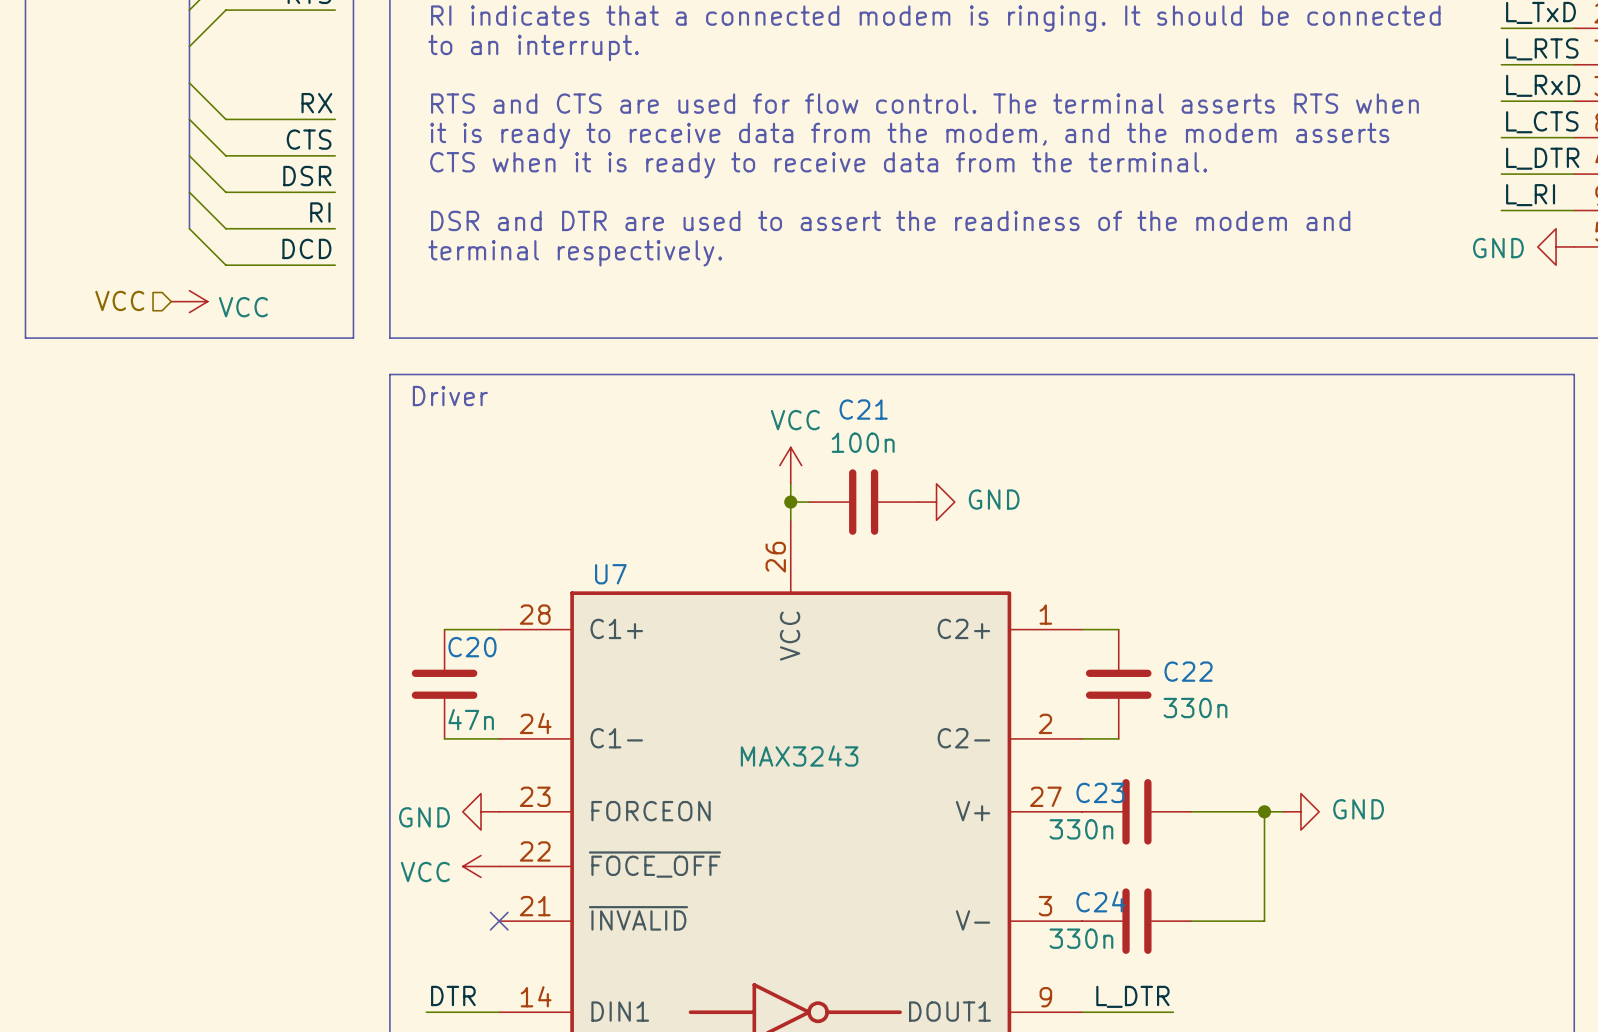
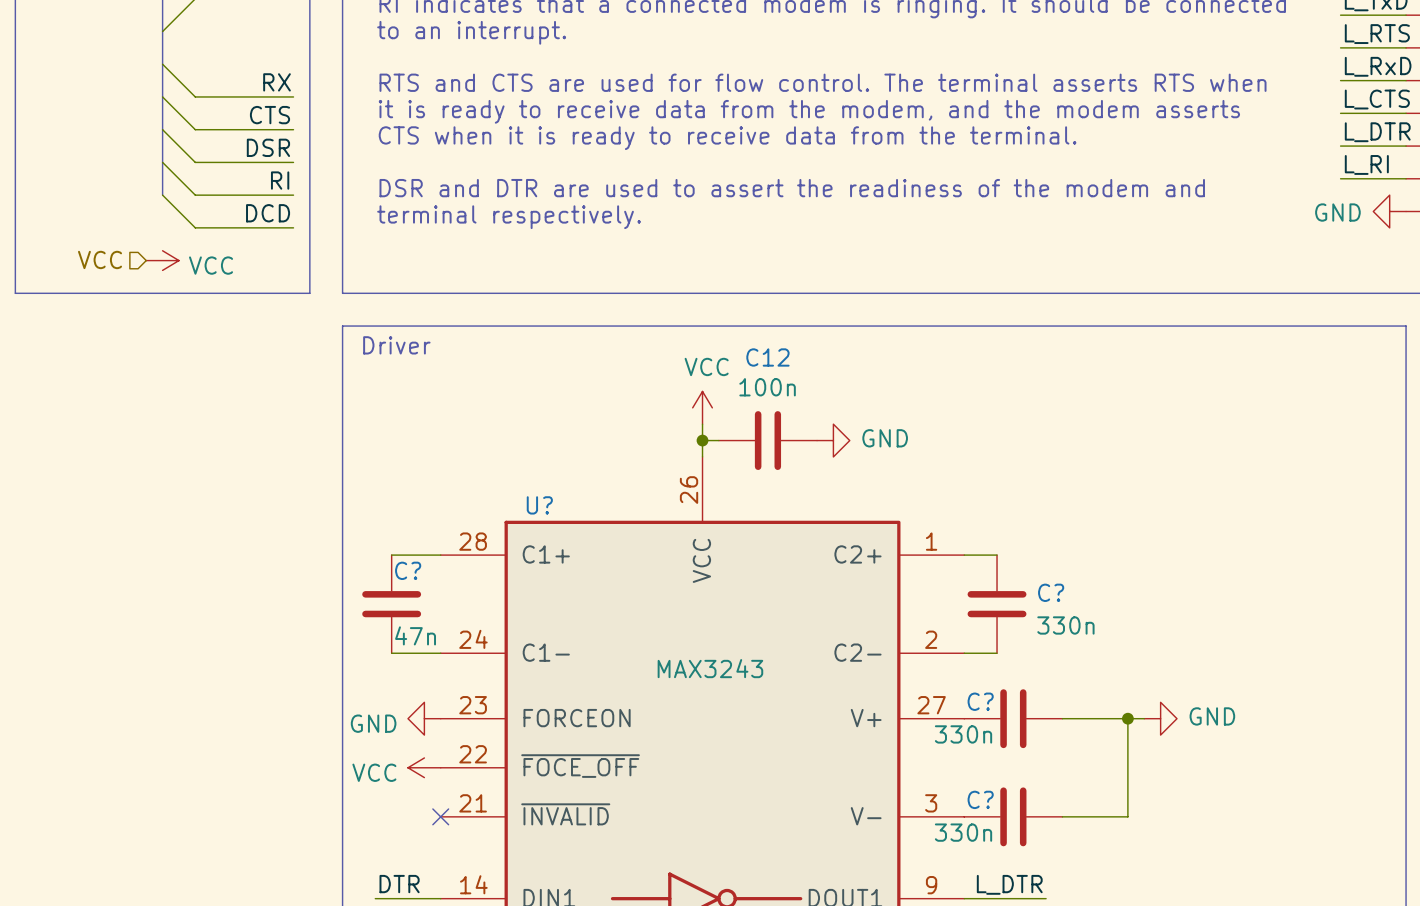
C21 name: C21 (863, 409) -> C12 (767, 357)
U7 name: U7 (610, 574) -> U? (539, 505)
C20 name: C20 (472, 647) -> C? (408, 570)
C22 name: C22 (1188, 671) -> C? (1051, 592)
C23 name: C23 (1100, 792) -> C? (980, 701)
C24 name: C24 (1100, 901) -> C? (980, 799)

